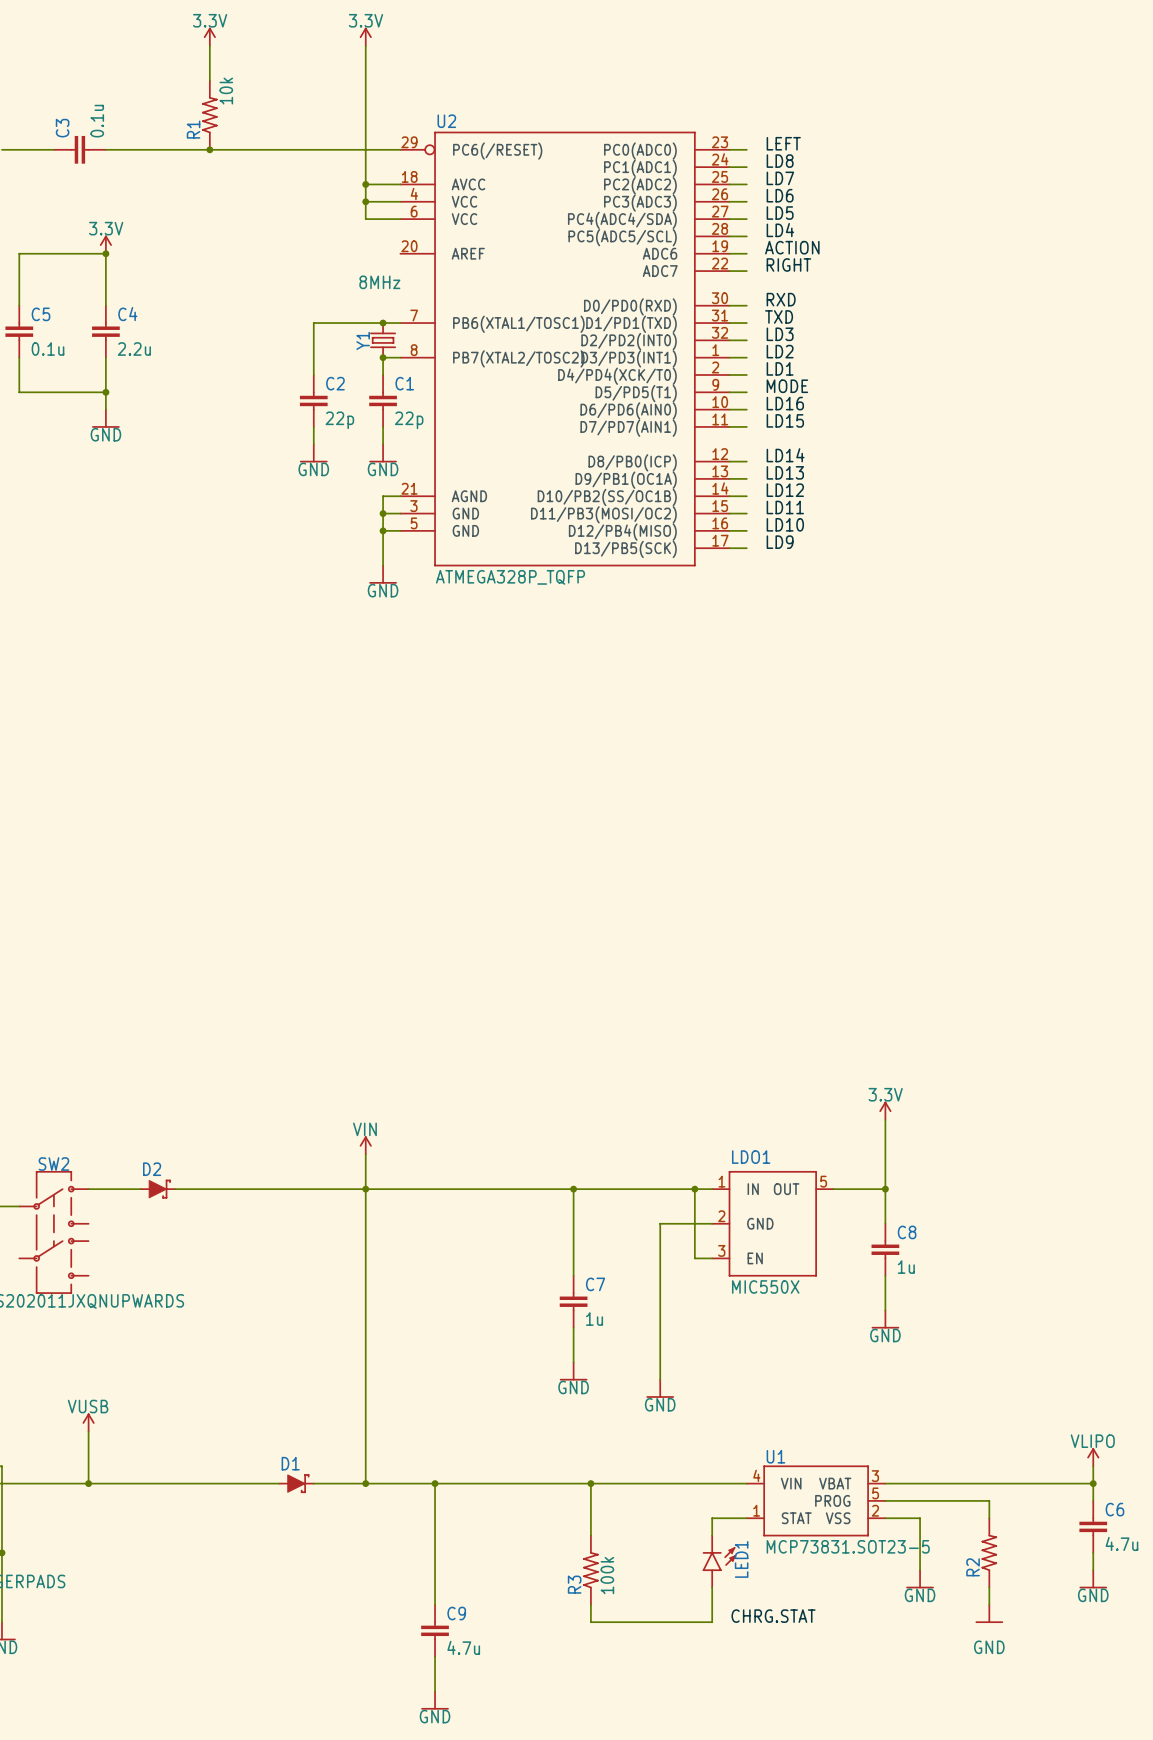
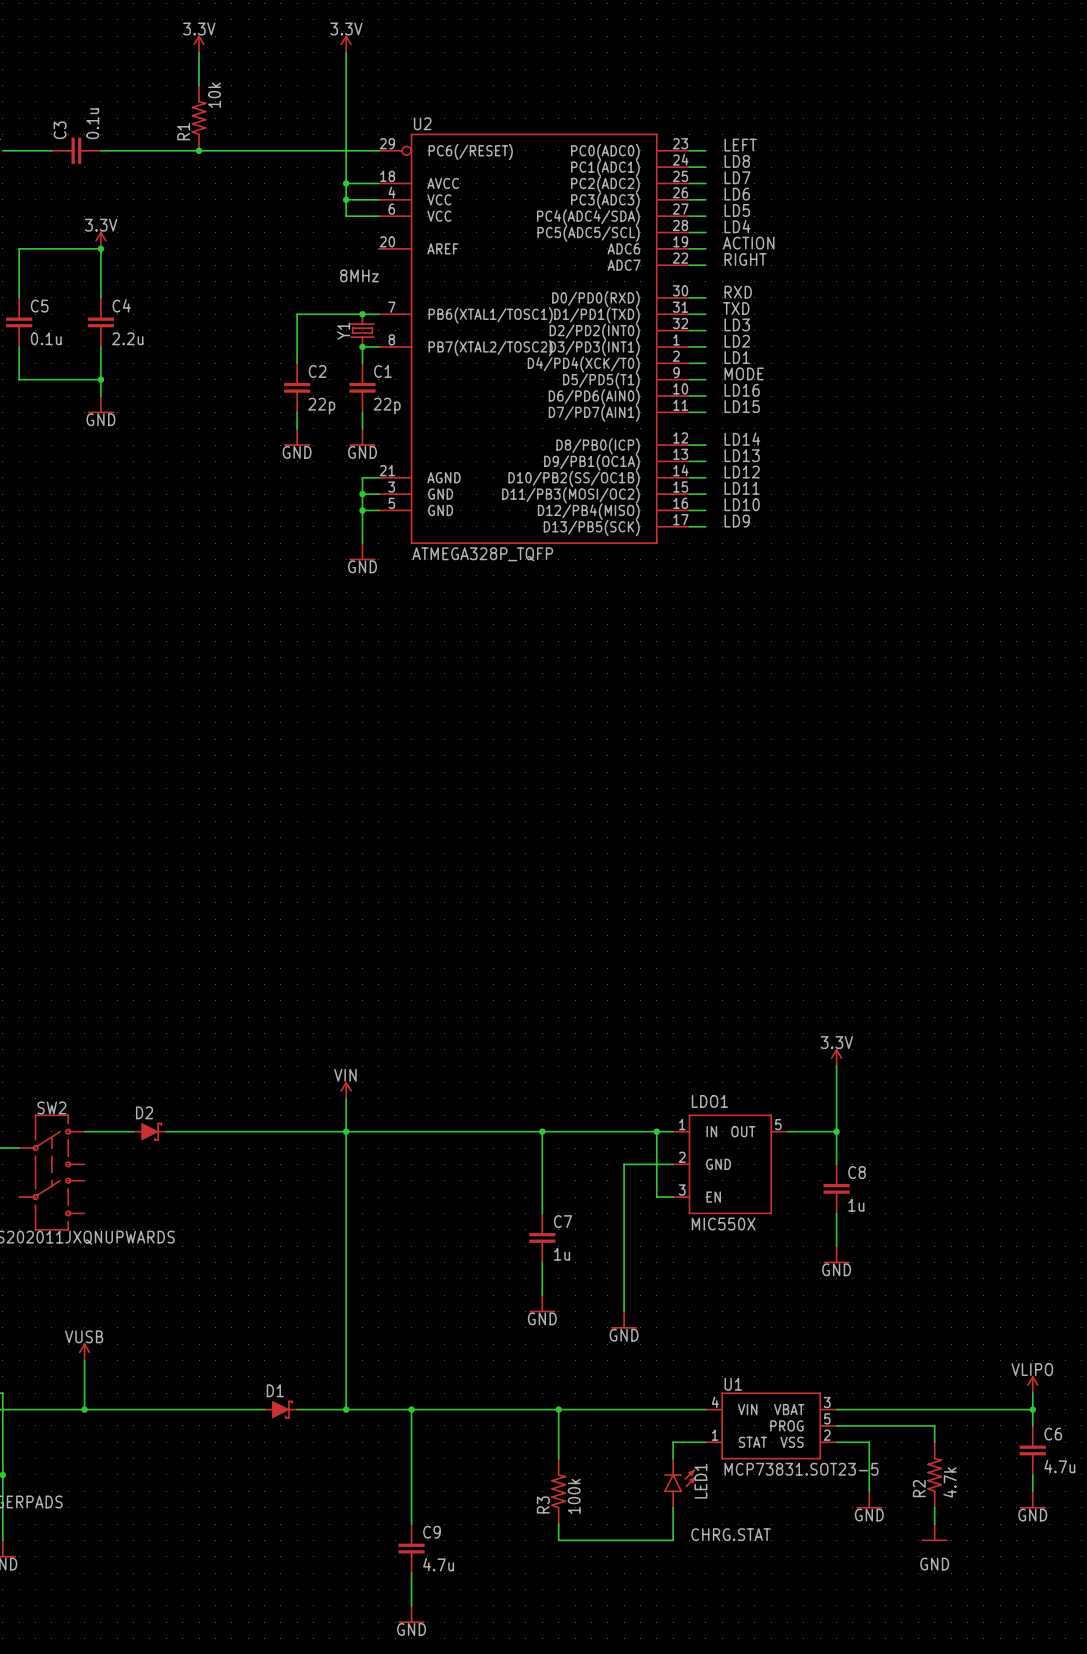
R2 value: none -> 4.7k (949, 1482)

